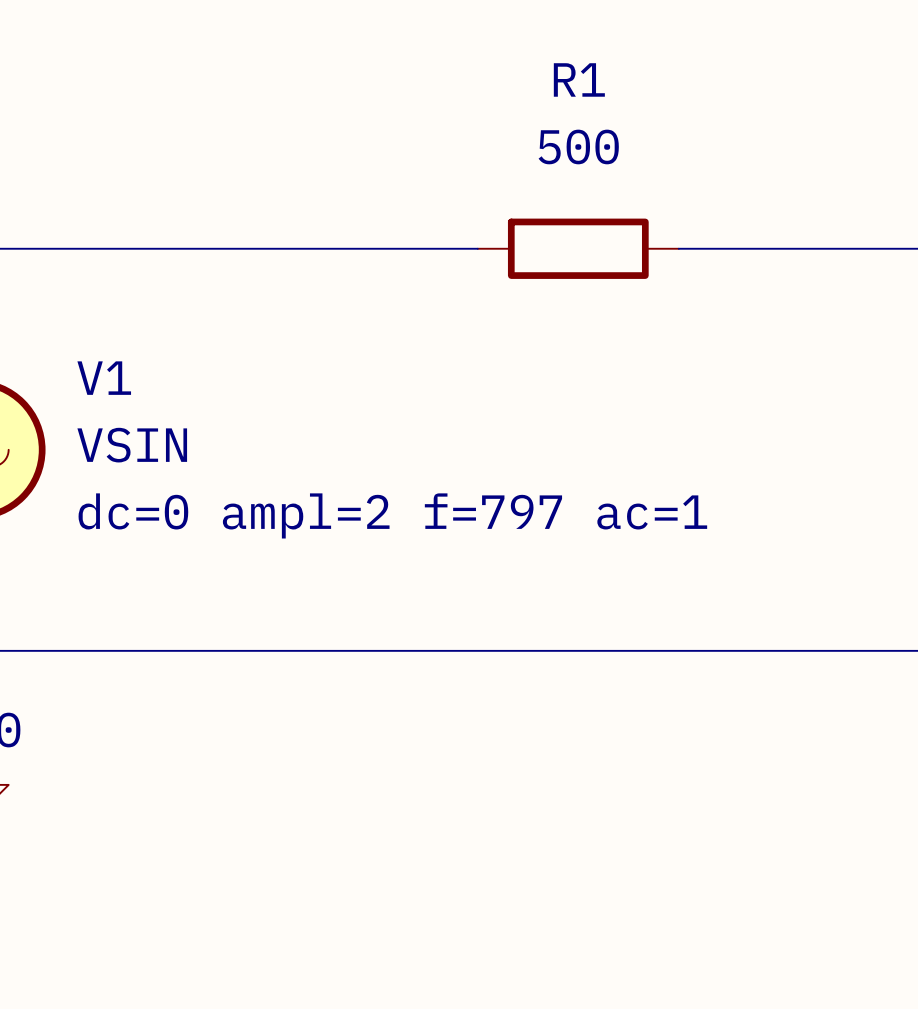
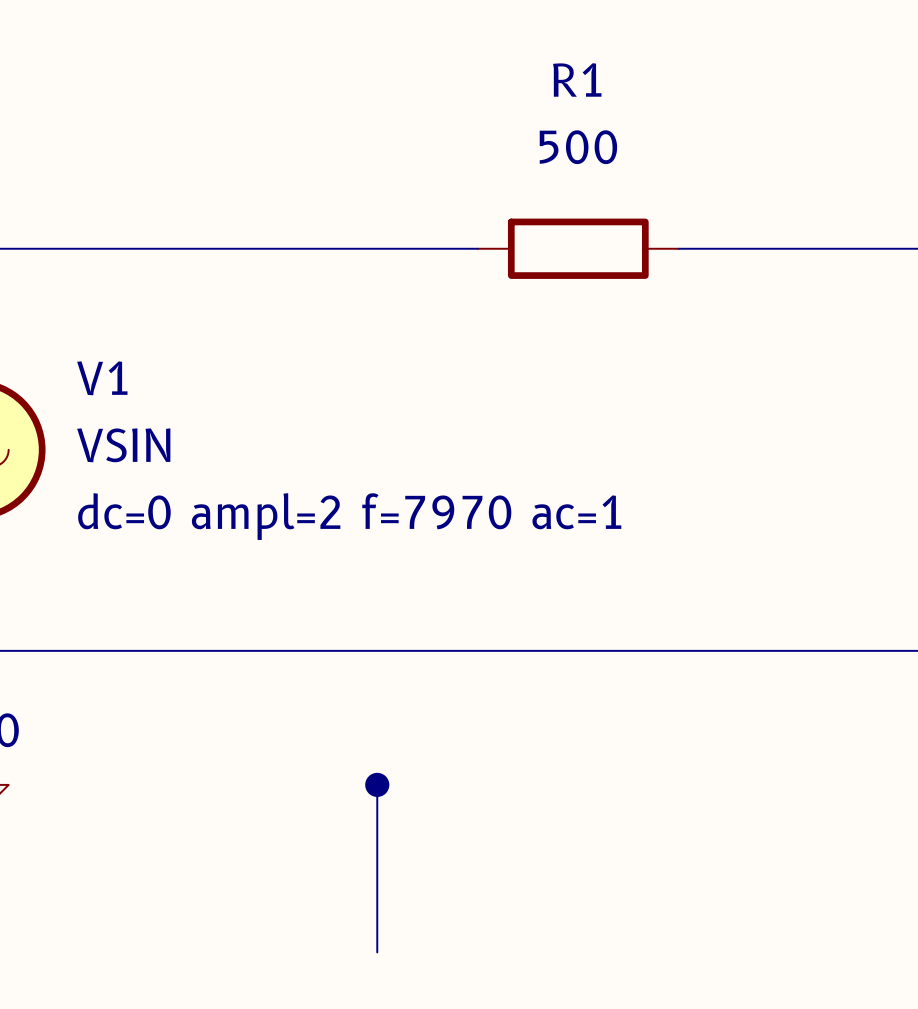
V1 text: dc=0 ampl=2 f=797 ac=1 (392, 515) -> dc=0 ampl=2 f=7970 ac=1 (349, 516)
wire: none -> (377, 784) (377, 952)
junction: none -> (377, 784)

